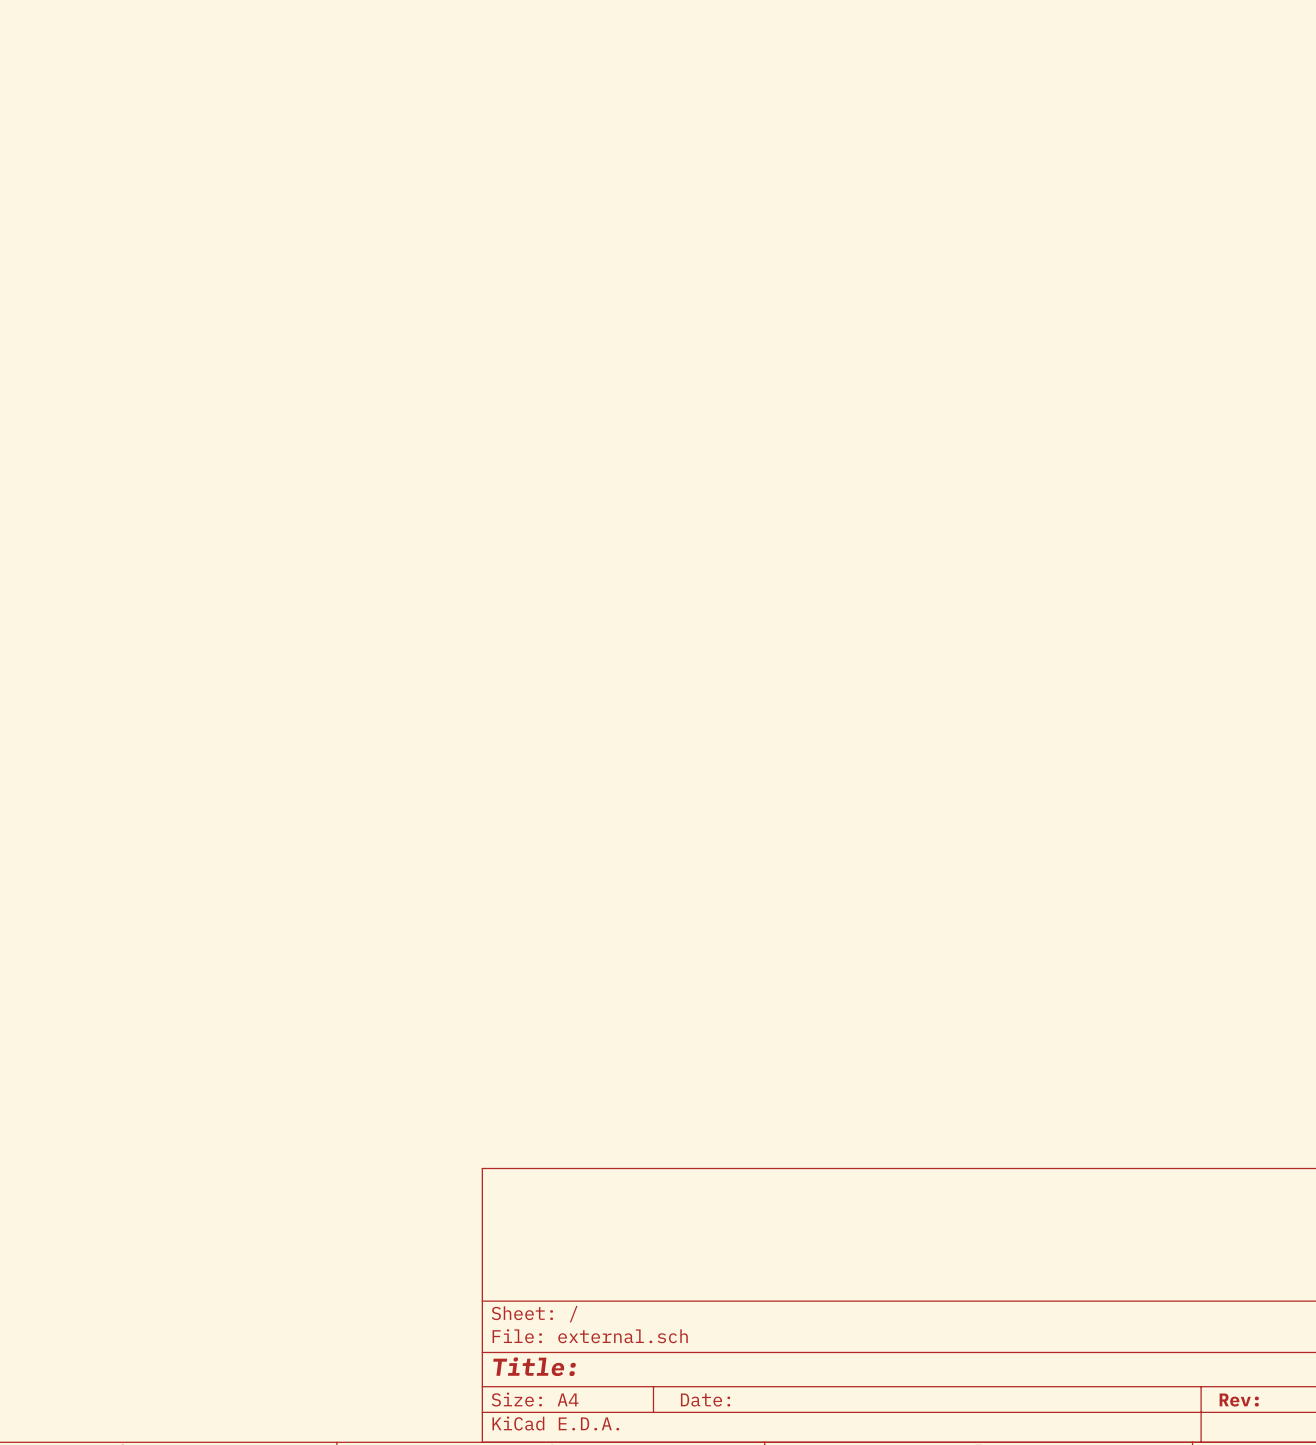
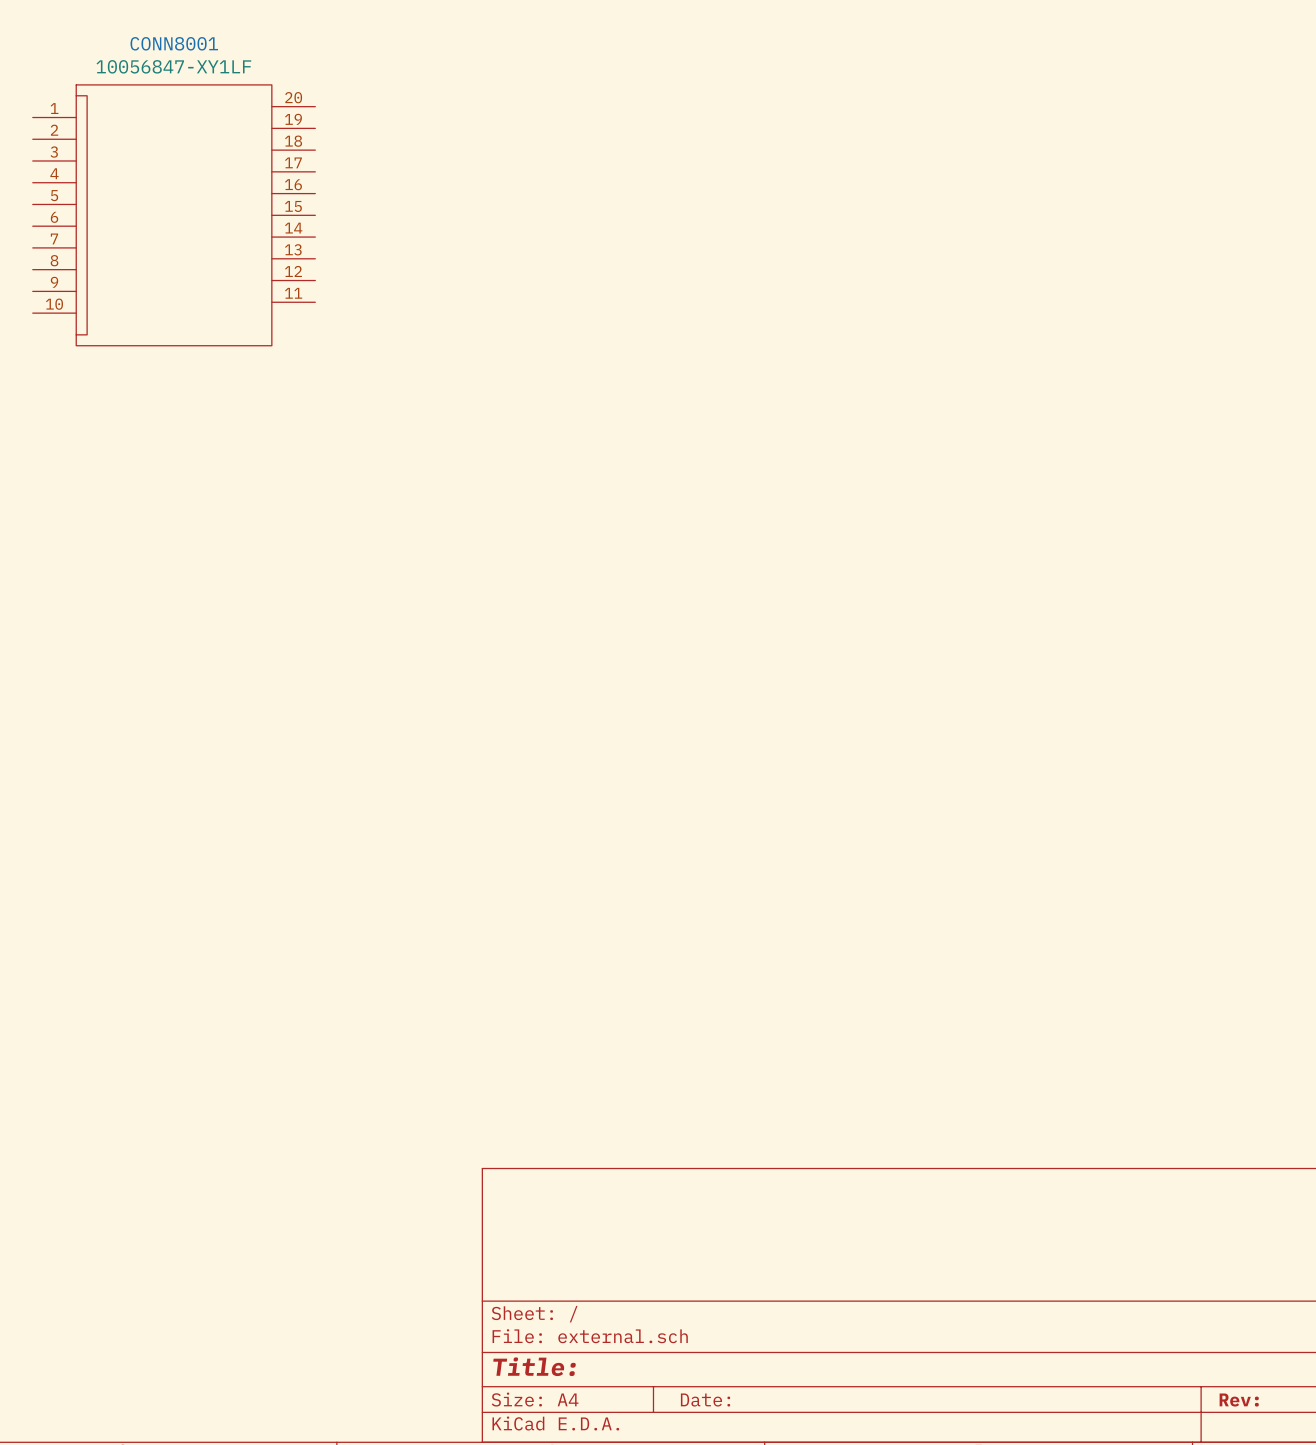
CONN8001: none -> 10056847-XY1LF (174, 215)

